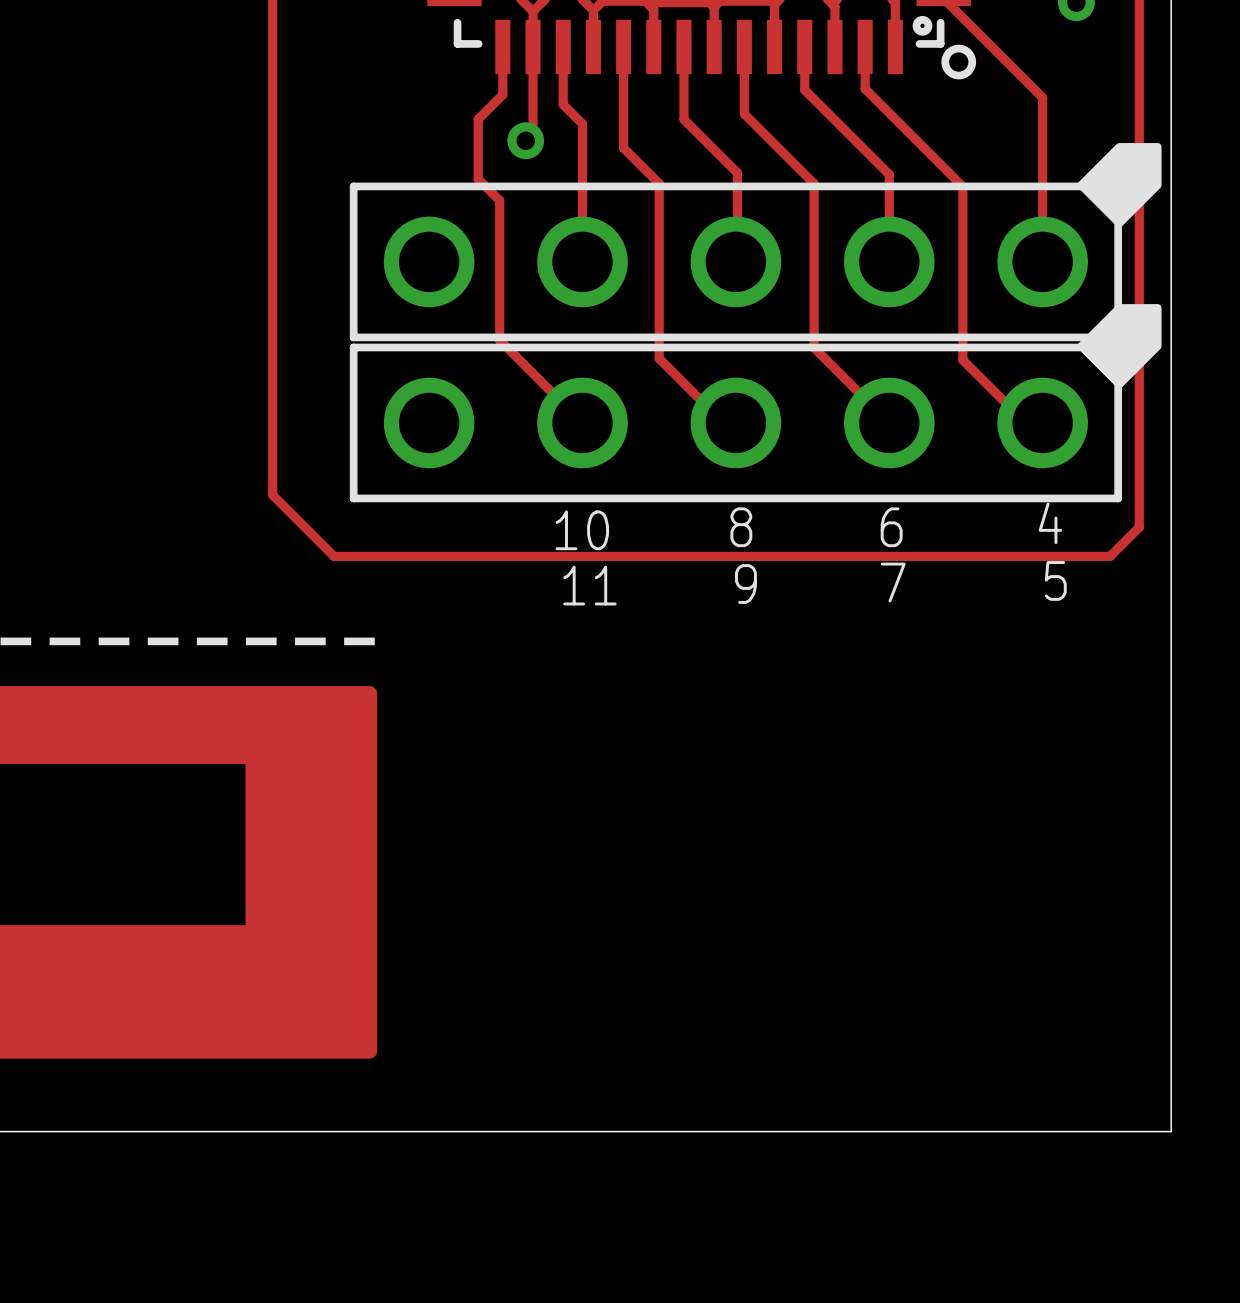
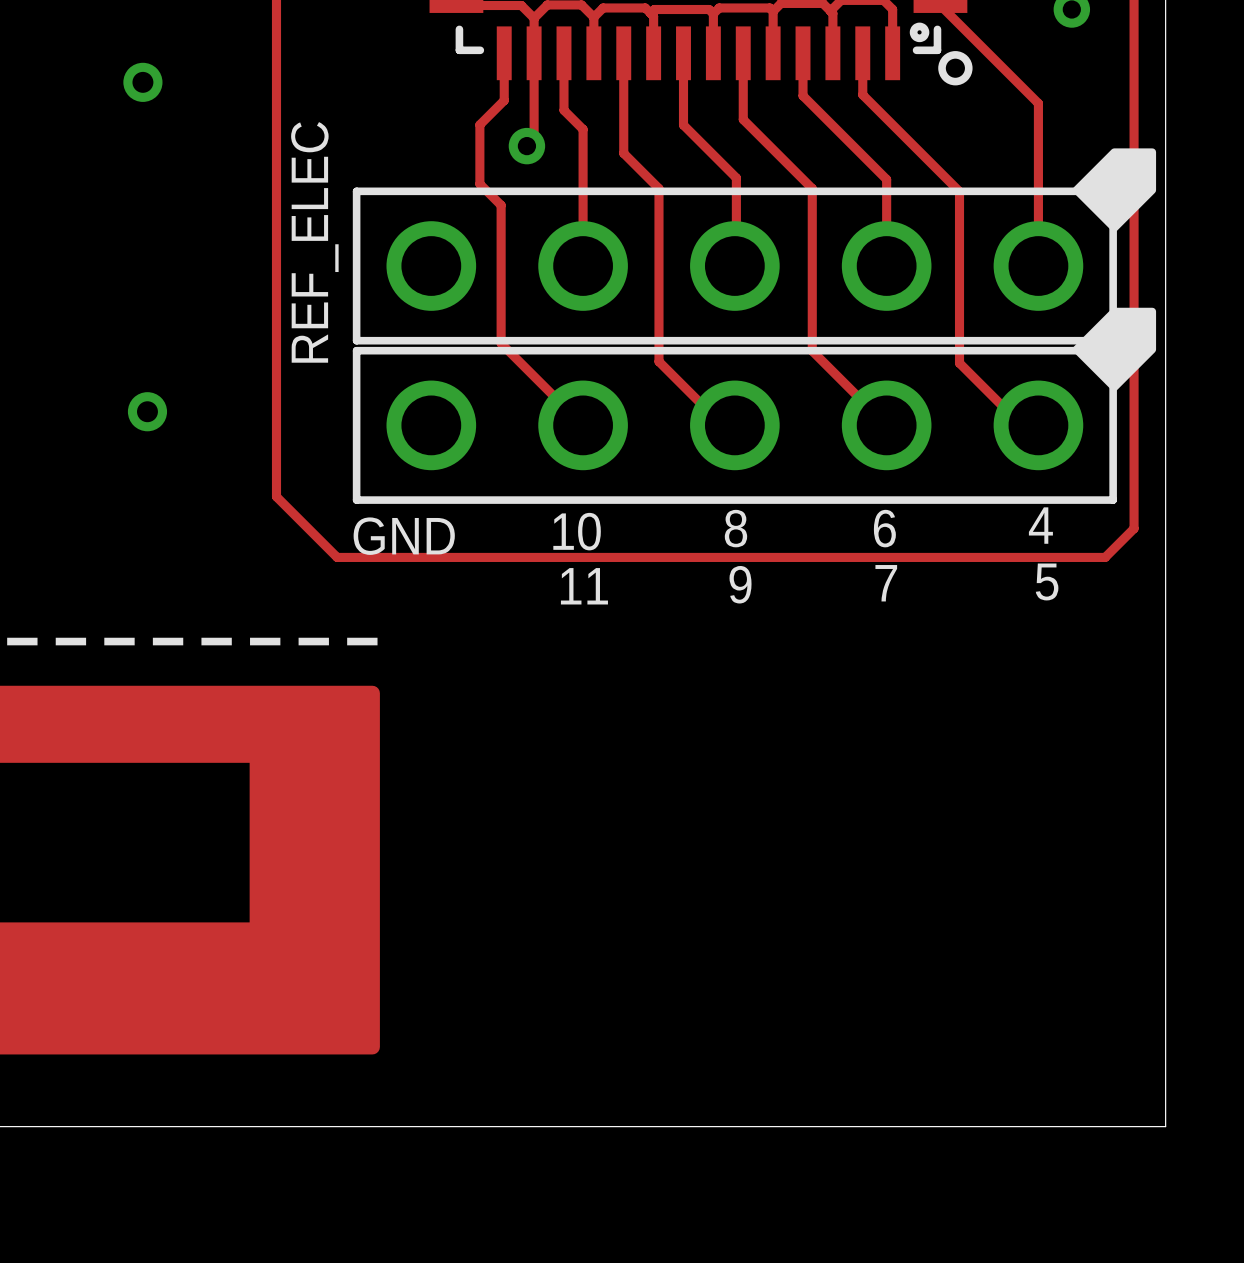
via: none -> (142, 82)
text: none -> REF_ELEC (314, 242)
via: none -> (147, 411)
text: none -> GND (404, 536)

